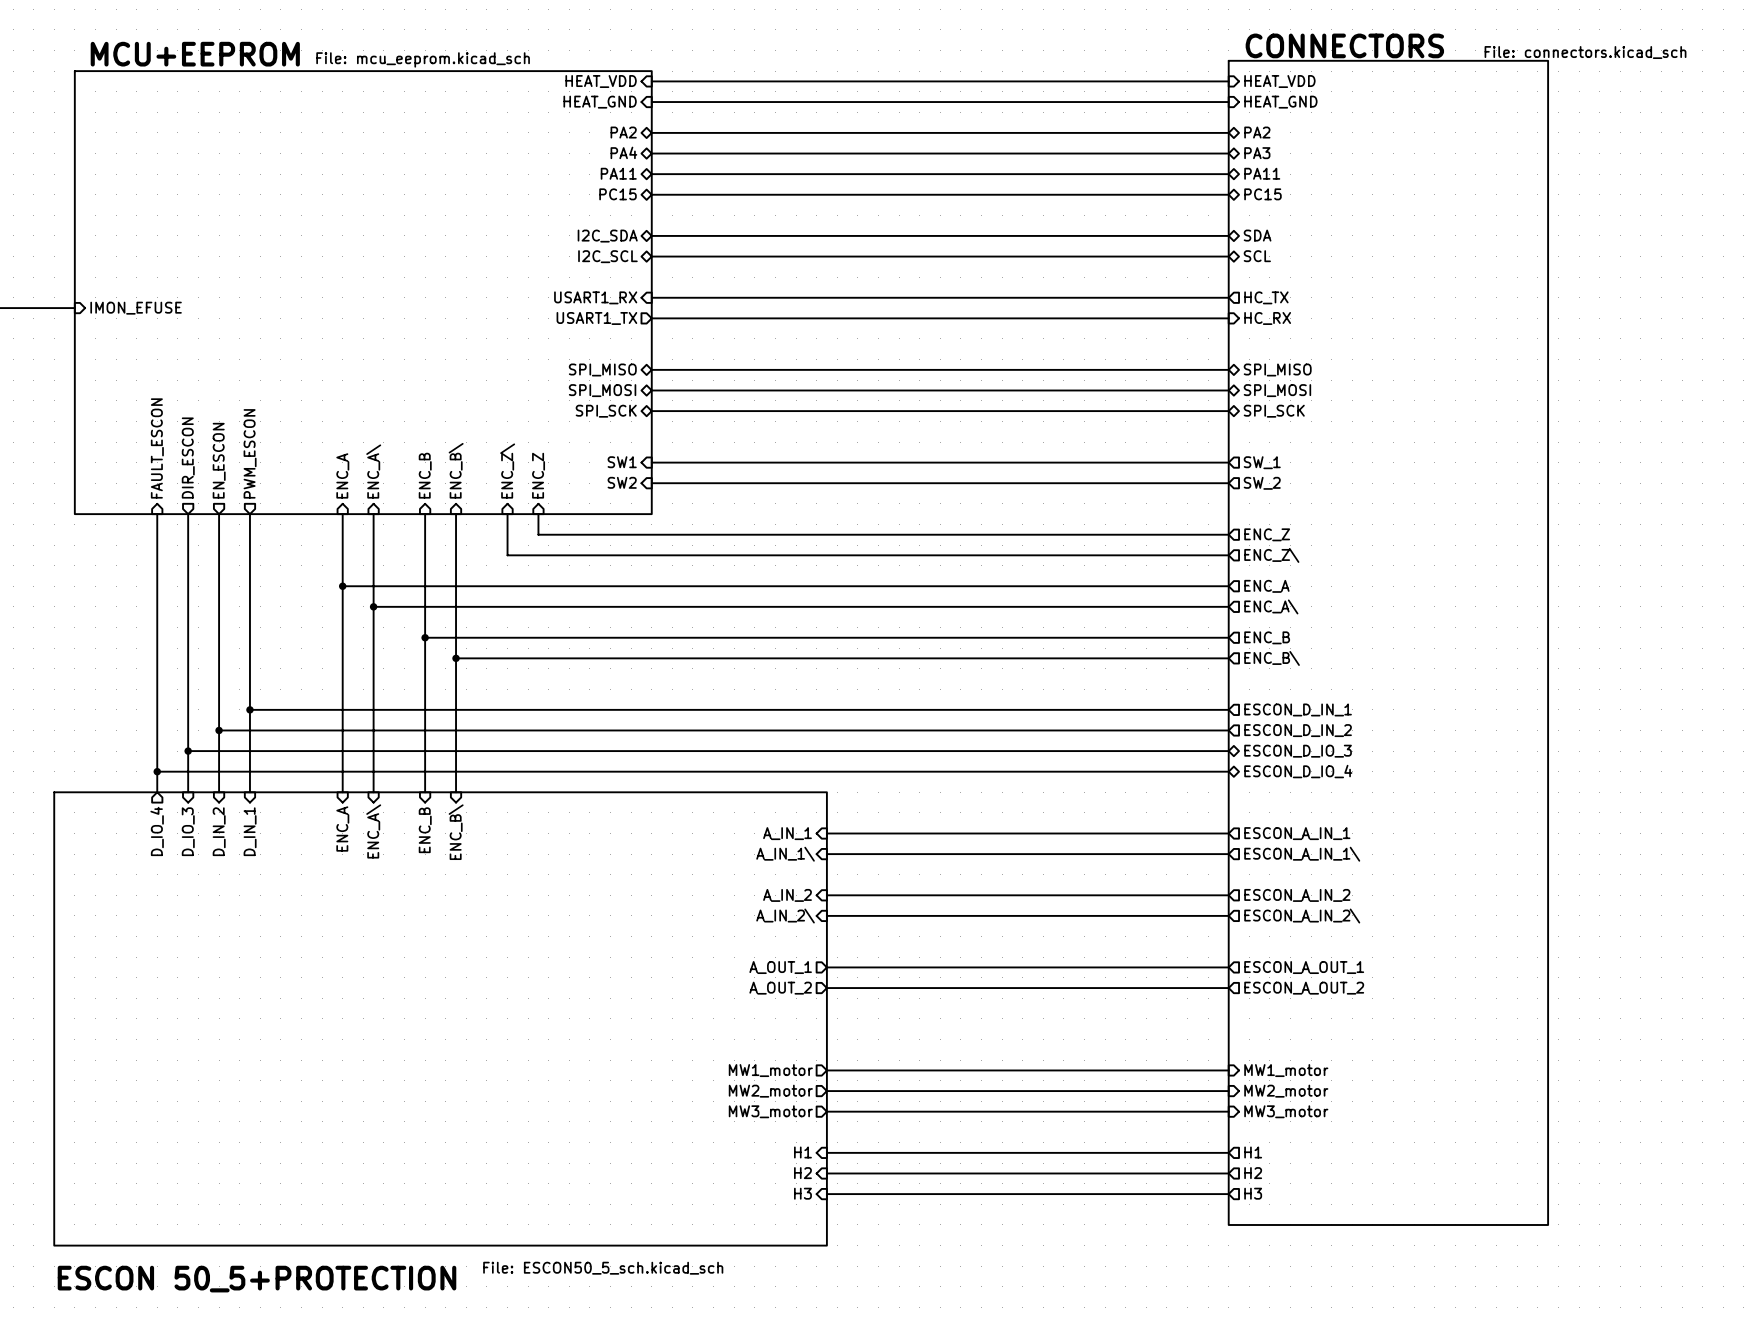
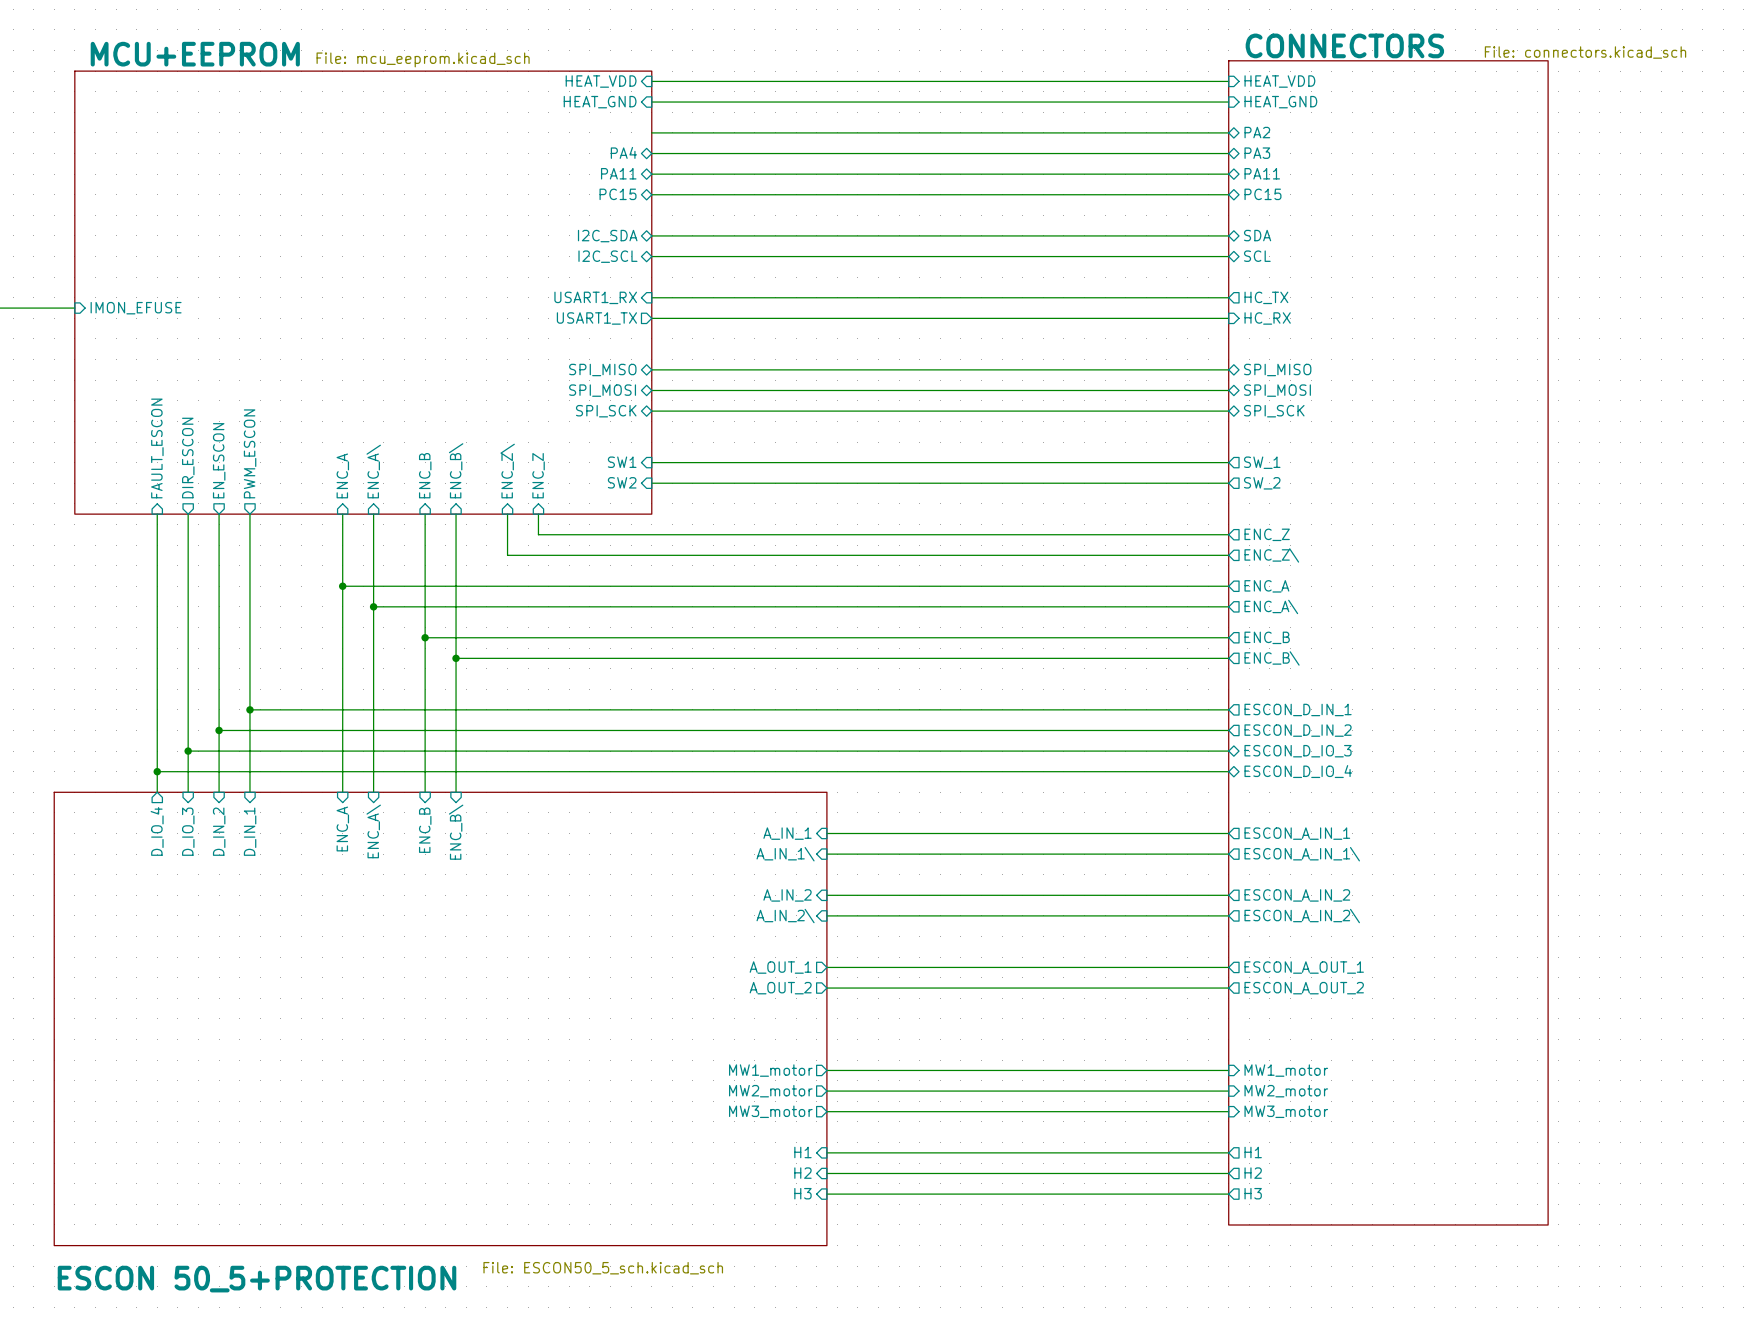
sheet pin: PA2 (623, 132) -> none

